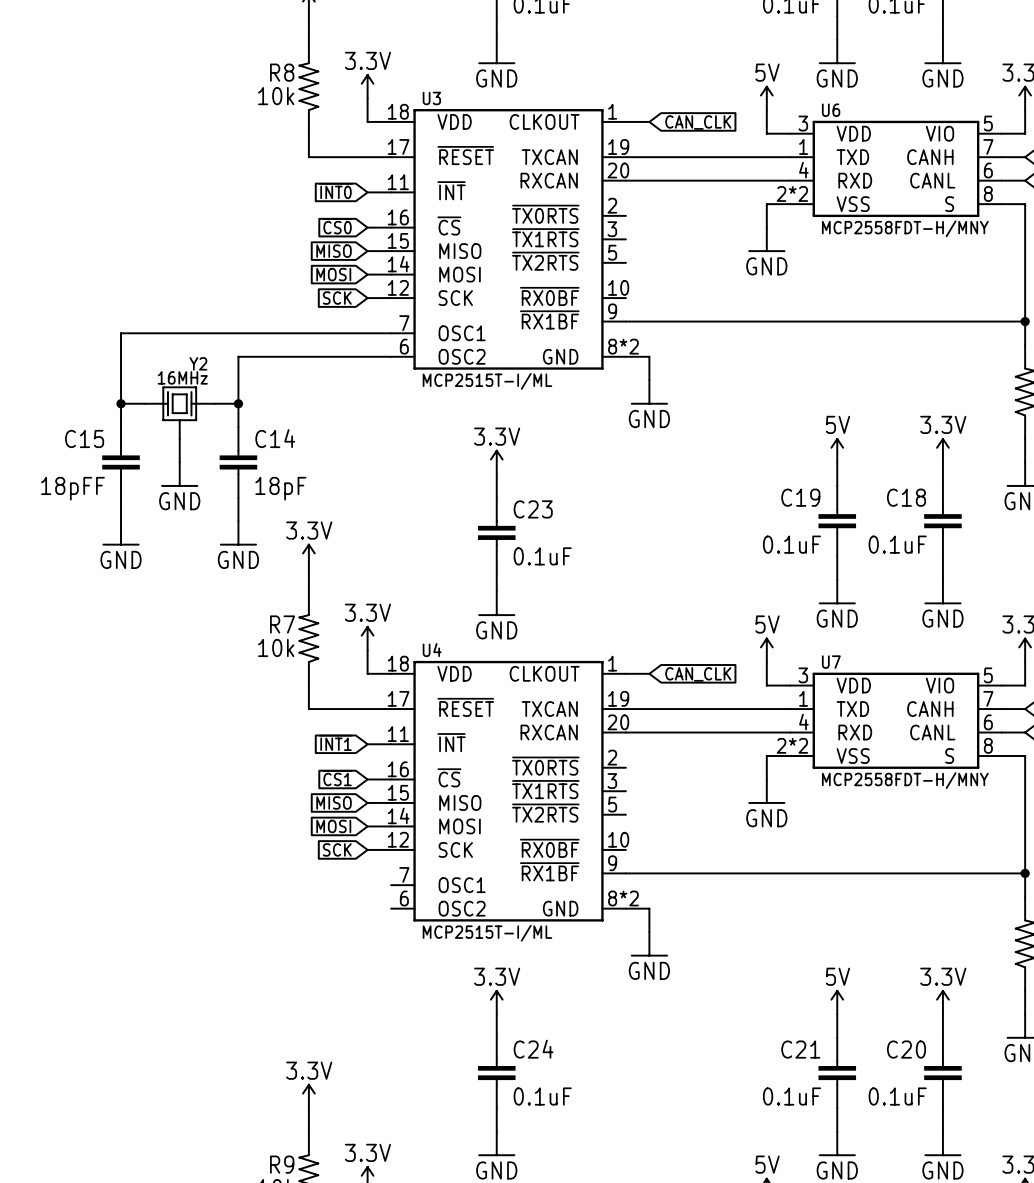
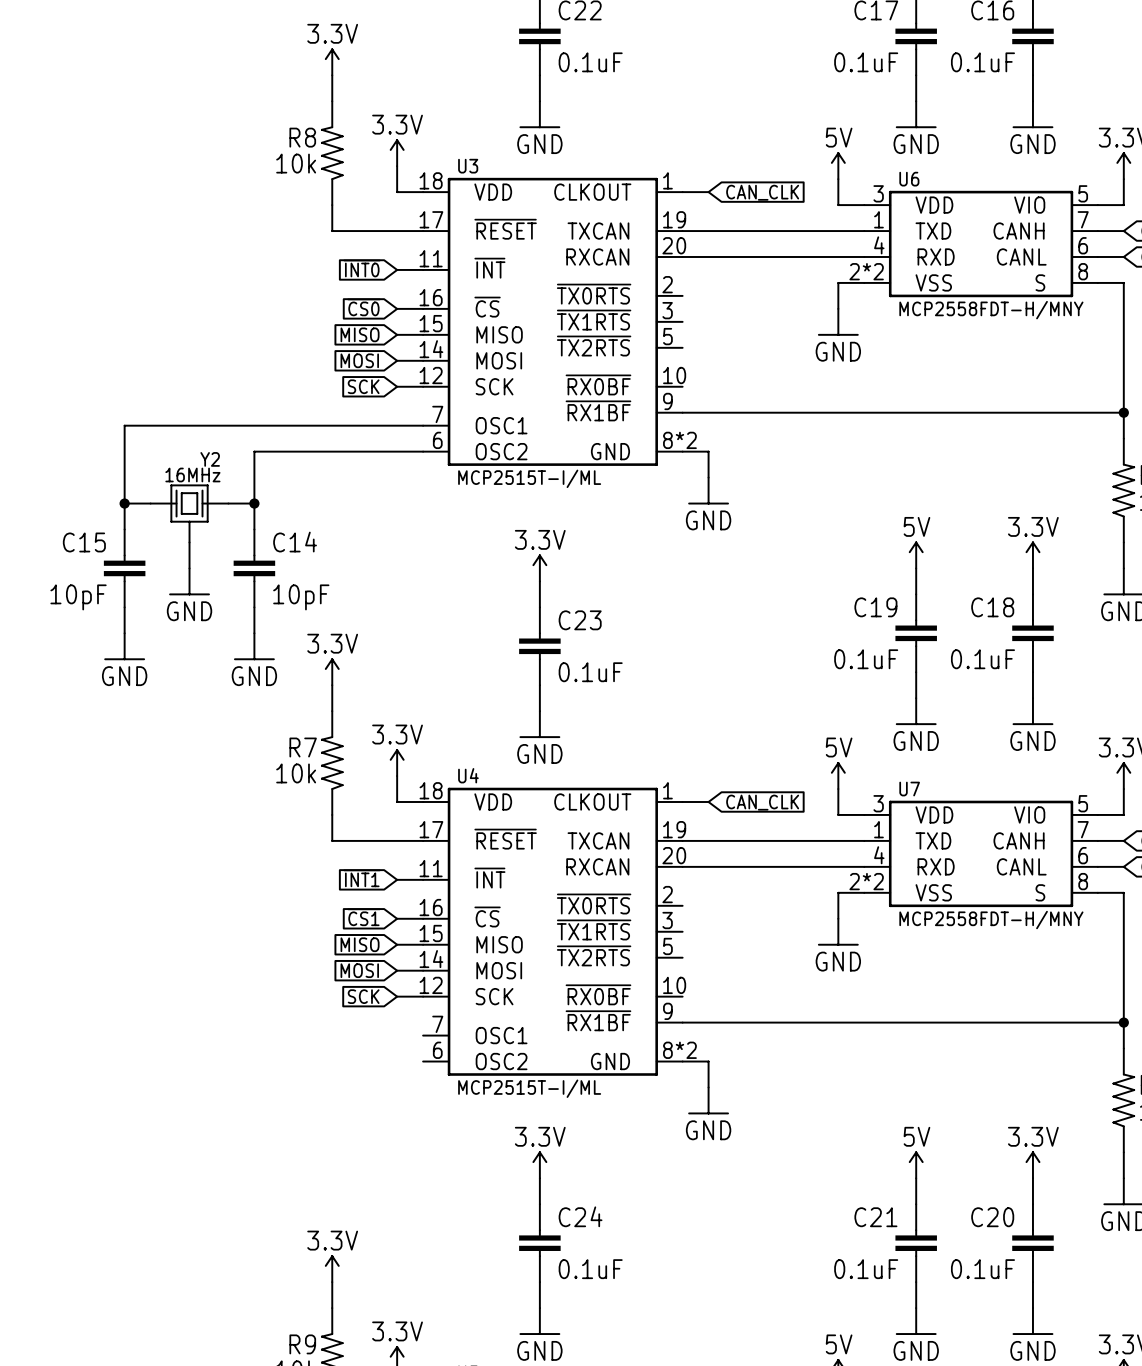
C15 value: 18pFF (72, 488) -> 10pF (78, 597)
C14 value: 18pF (280, 488) -> 10pF (301, 597)

